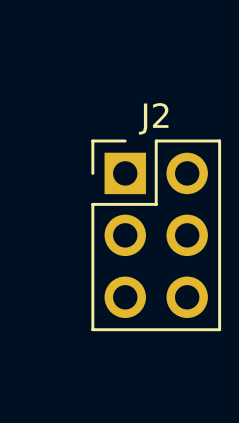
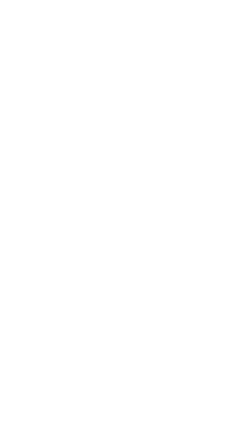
J2: (156, 235) -> none

